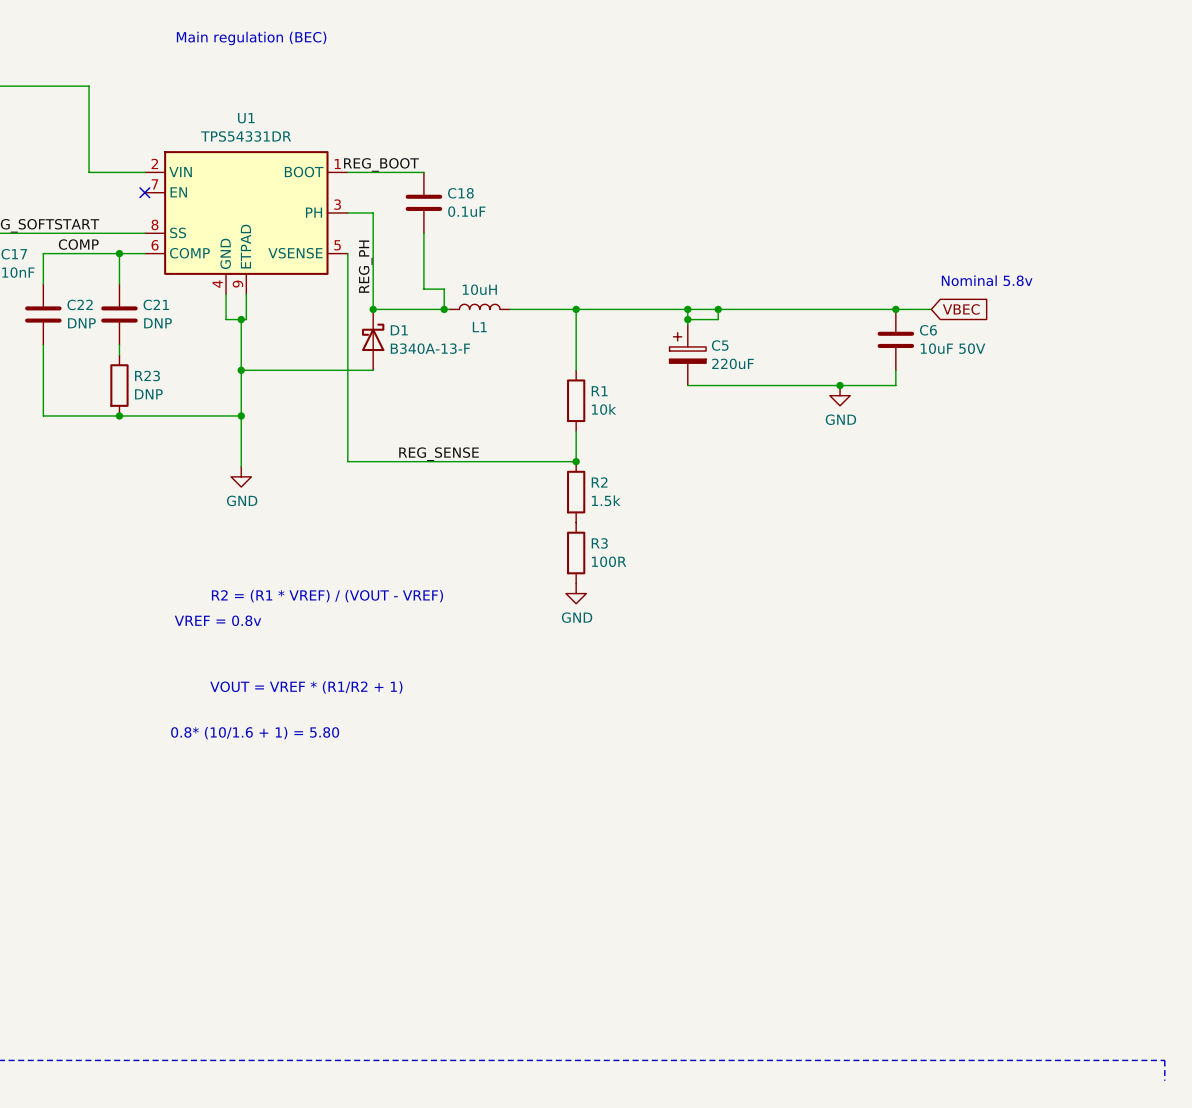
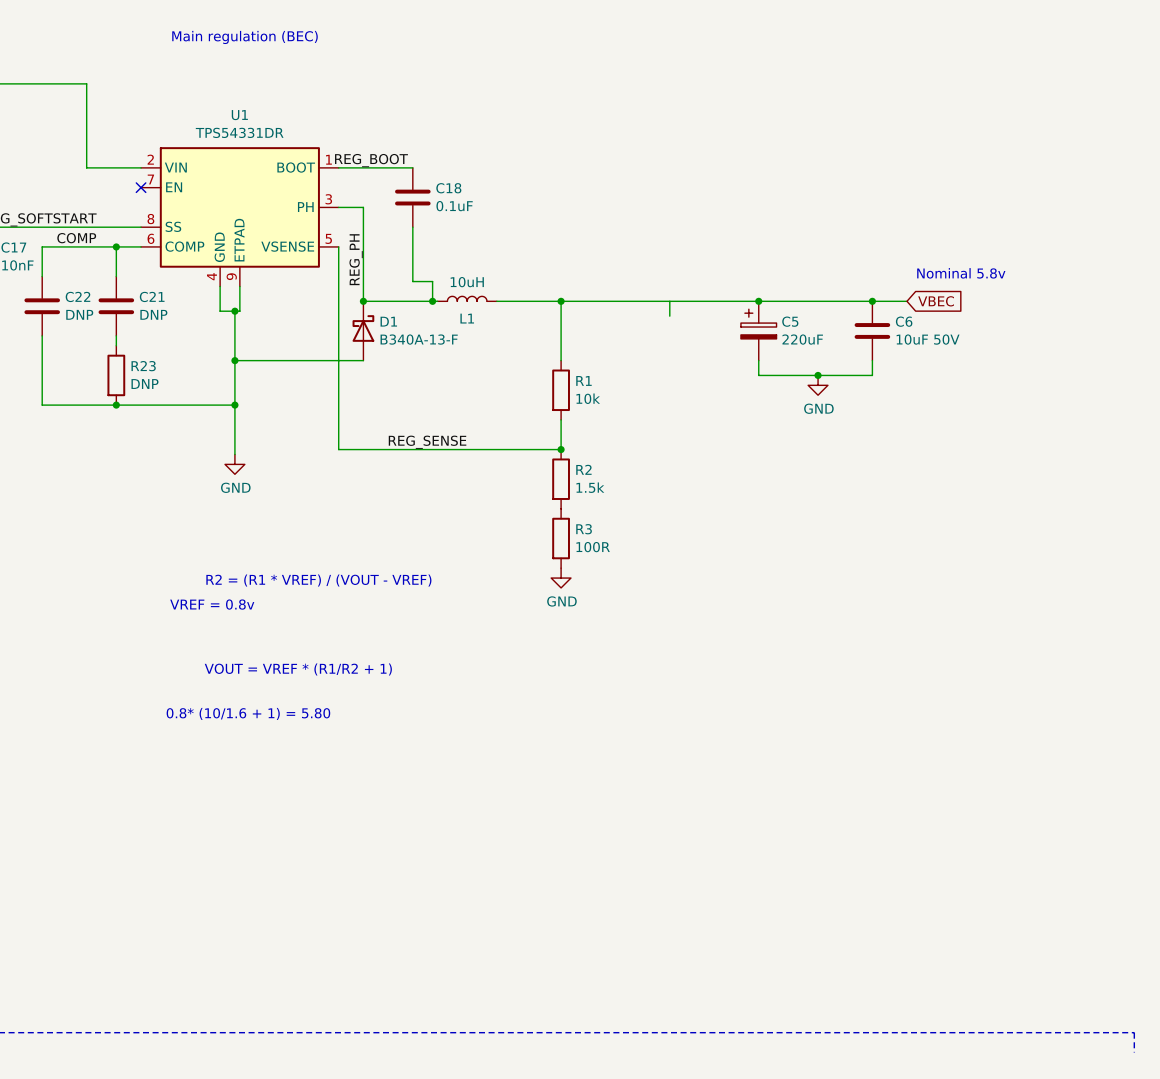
junction: (687, 309) -> none
wire: (718, 309) (718, 319) (687, 319) -> none
junction: (718, 309) -> none
junction: none -> (758, 301)
junction: (687, 319) -> none
C5 position: (687, 355) -> (758, 330)
wire: (687, 385) (779, 385) -> (758, 360) (758, 375)

